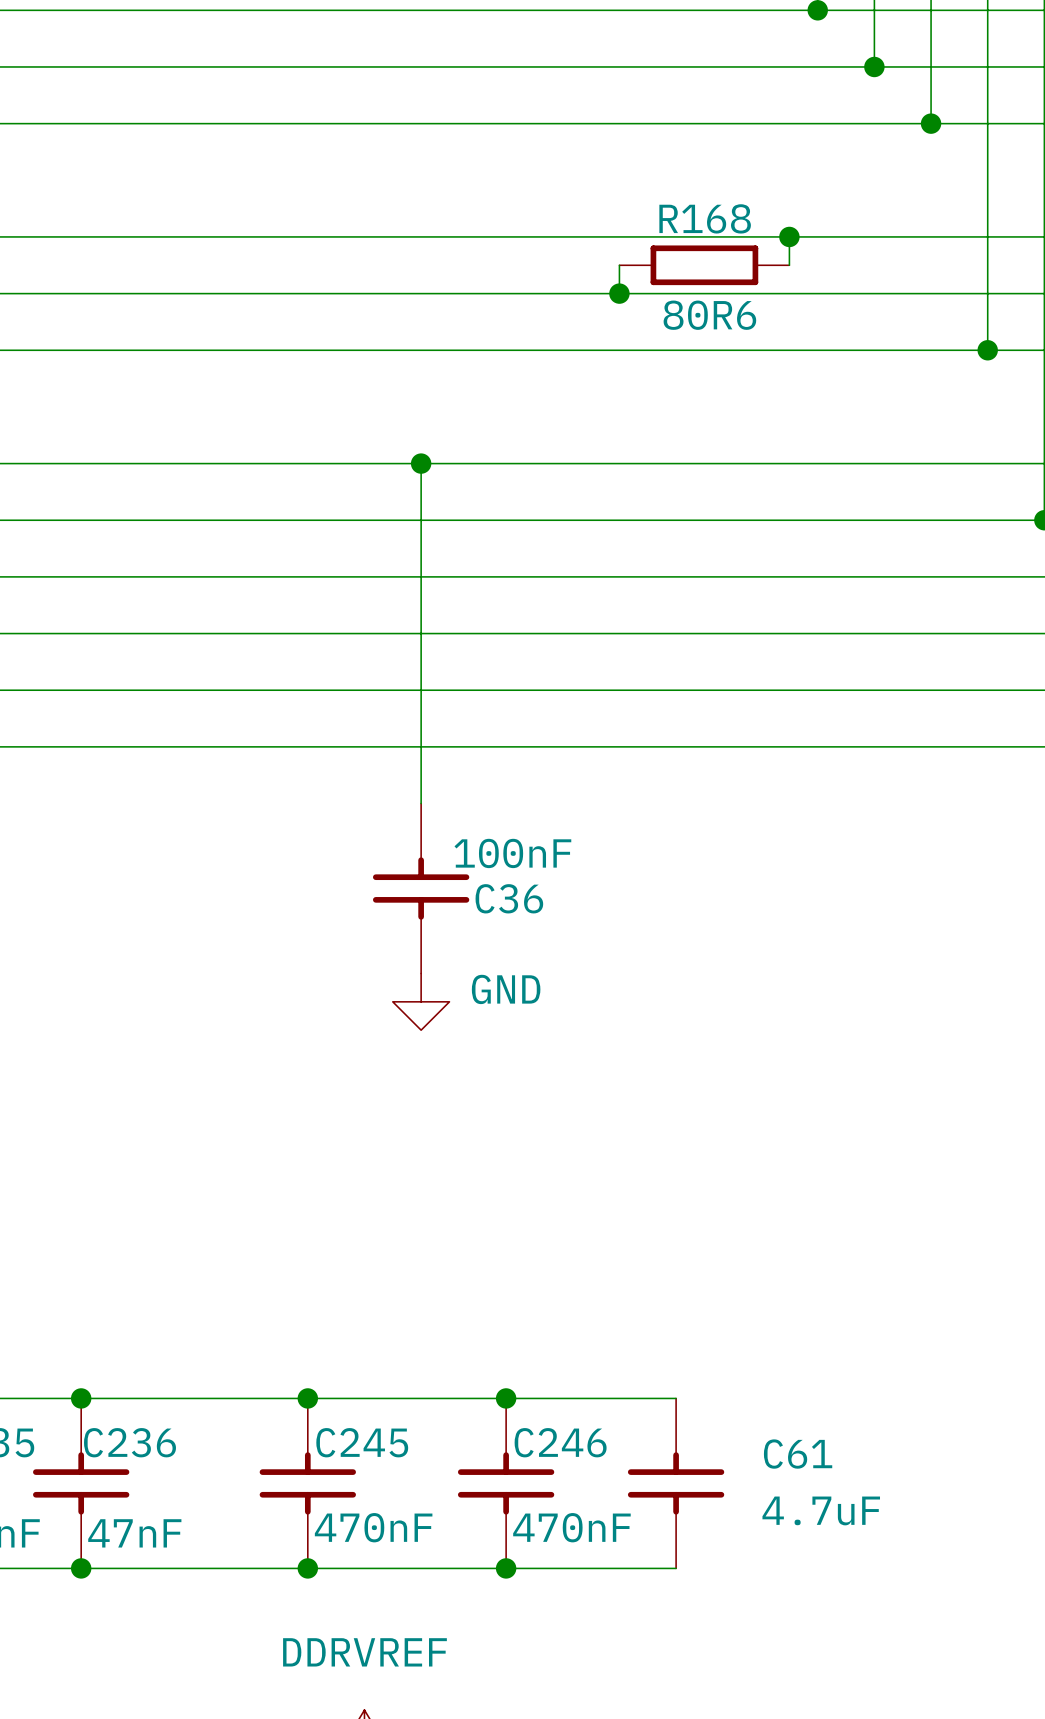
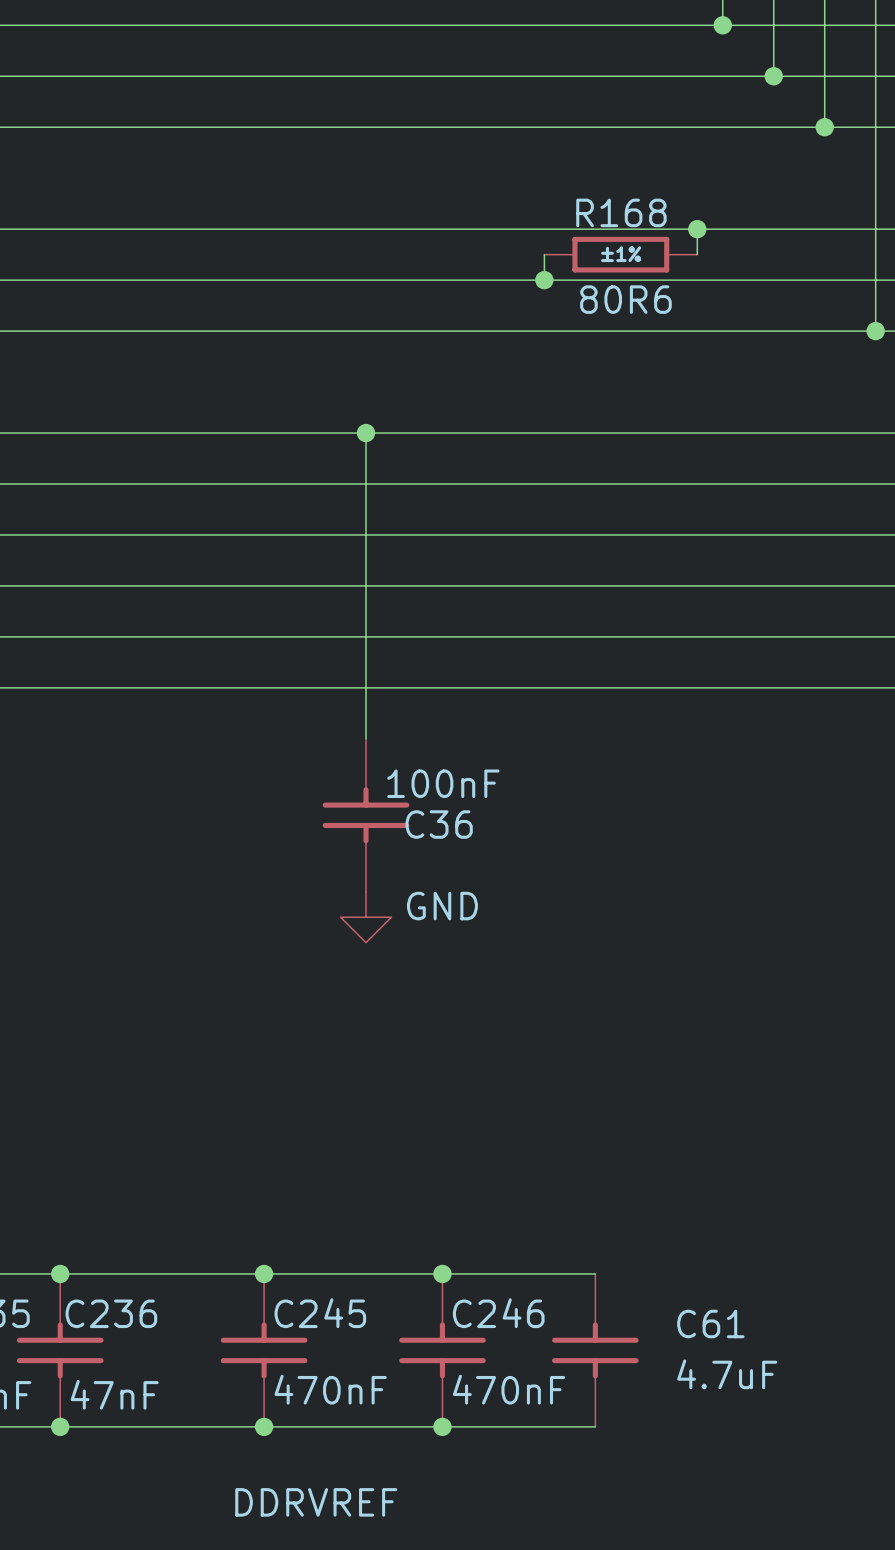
R168 text: none -> ±1% (621, 254)

